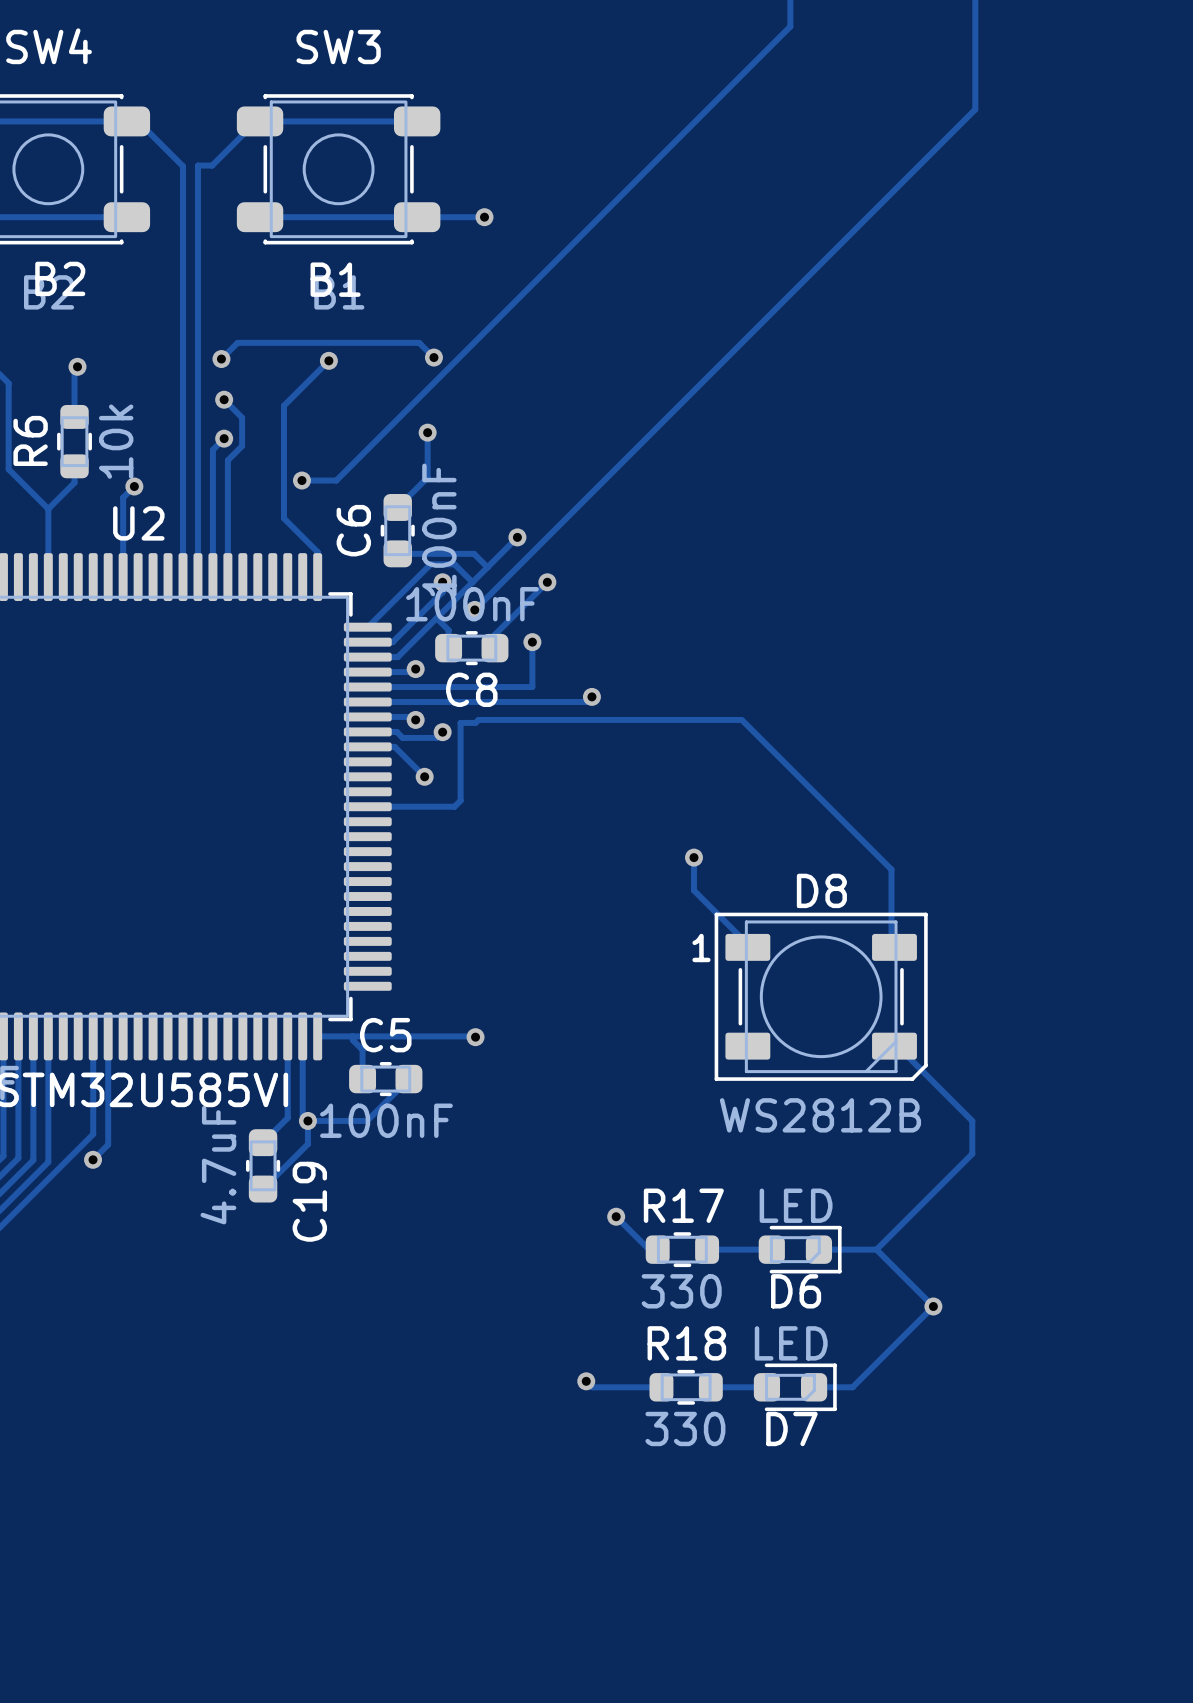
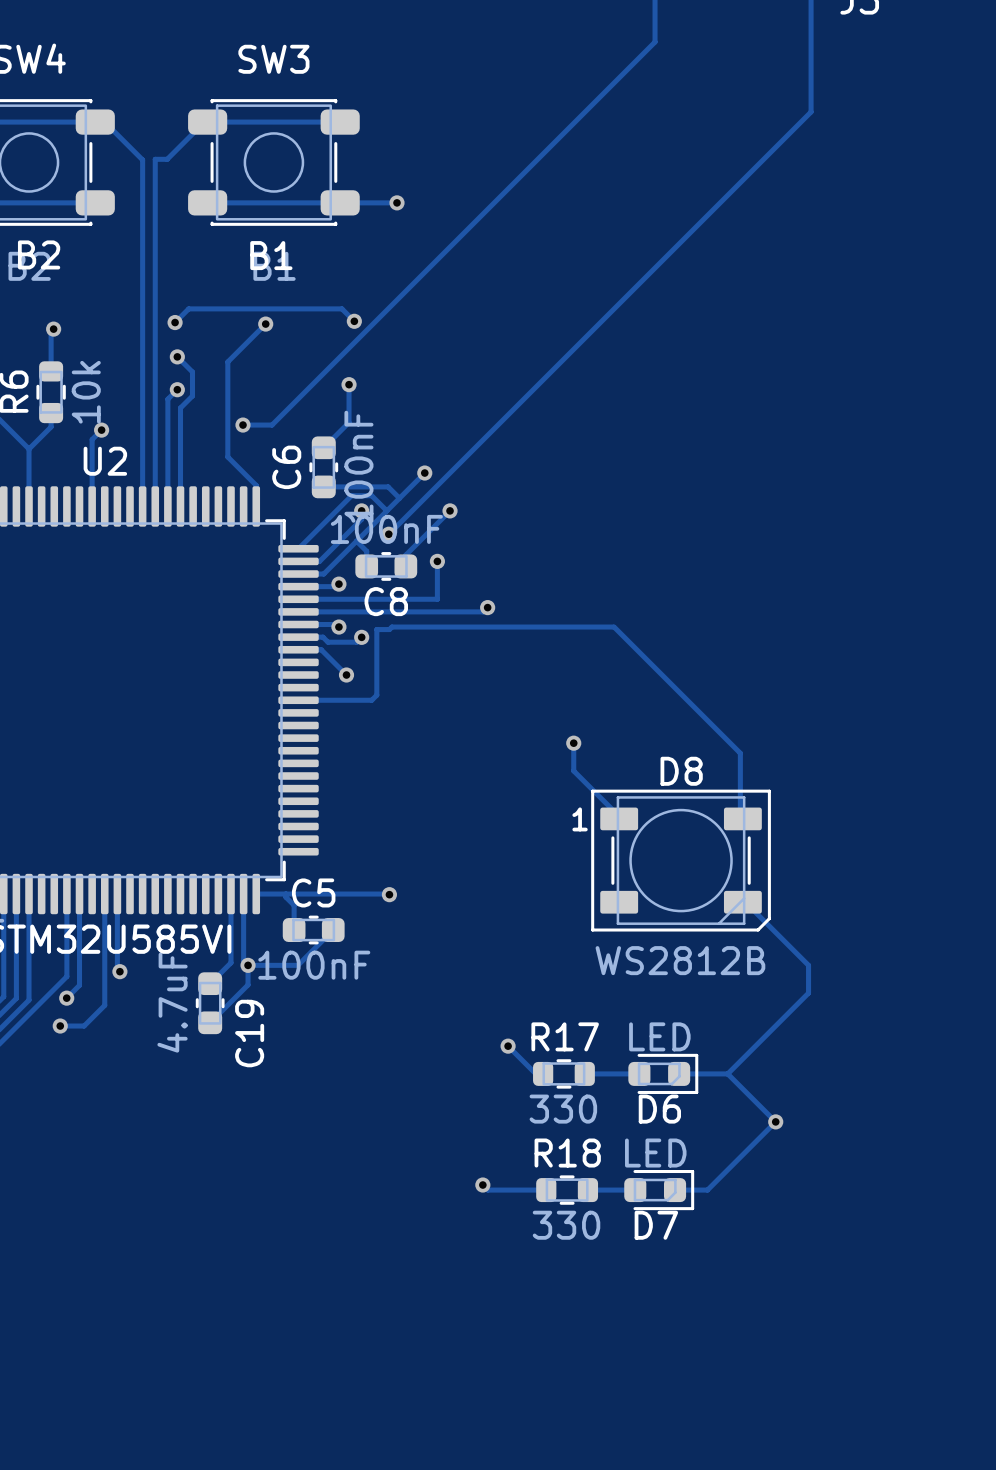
track: none -> (104, 894) (104, 1005) (84, 1026) (60, 1026)
track: none -> (117, 894) (117, 969) (119, 971)
via: none -> (119, 971)
via: none -> (60, 1026)

